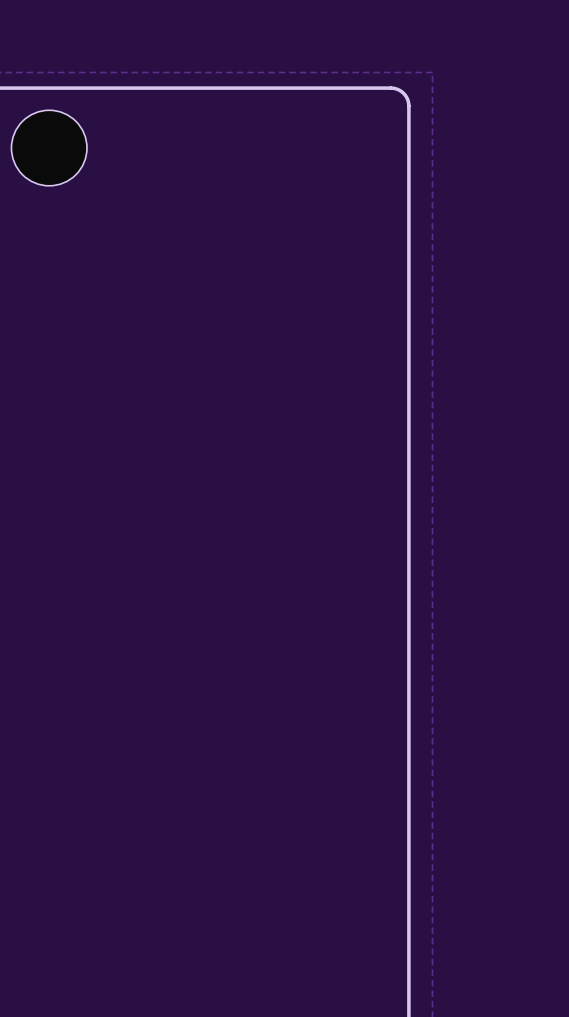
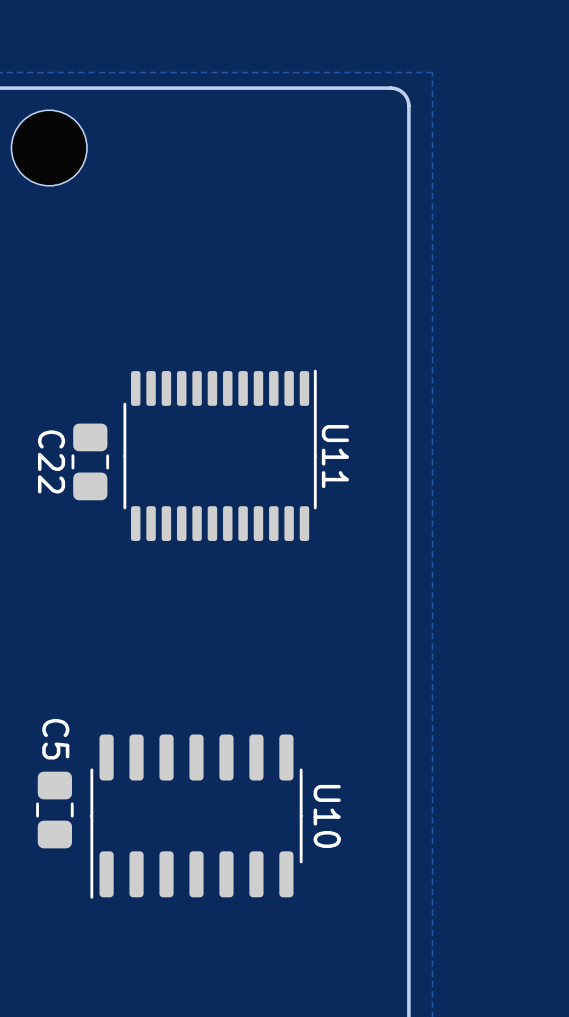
U11: none -> (220, 455)
C22: none -> (90, 461)
C5: none -> (54, 810)
U10: none -> (196, 816)

